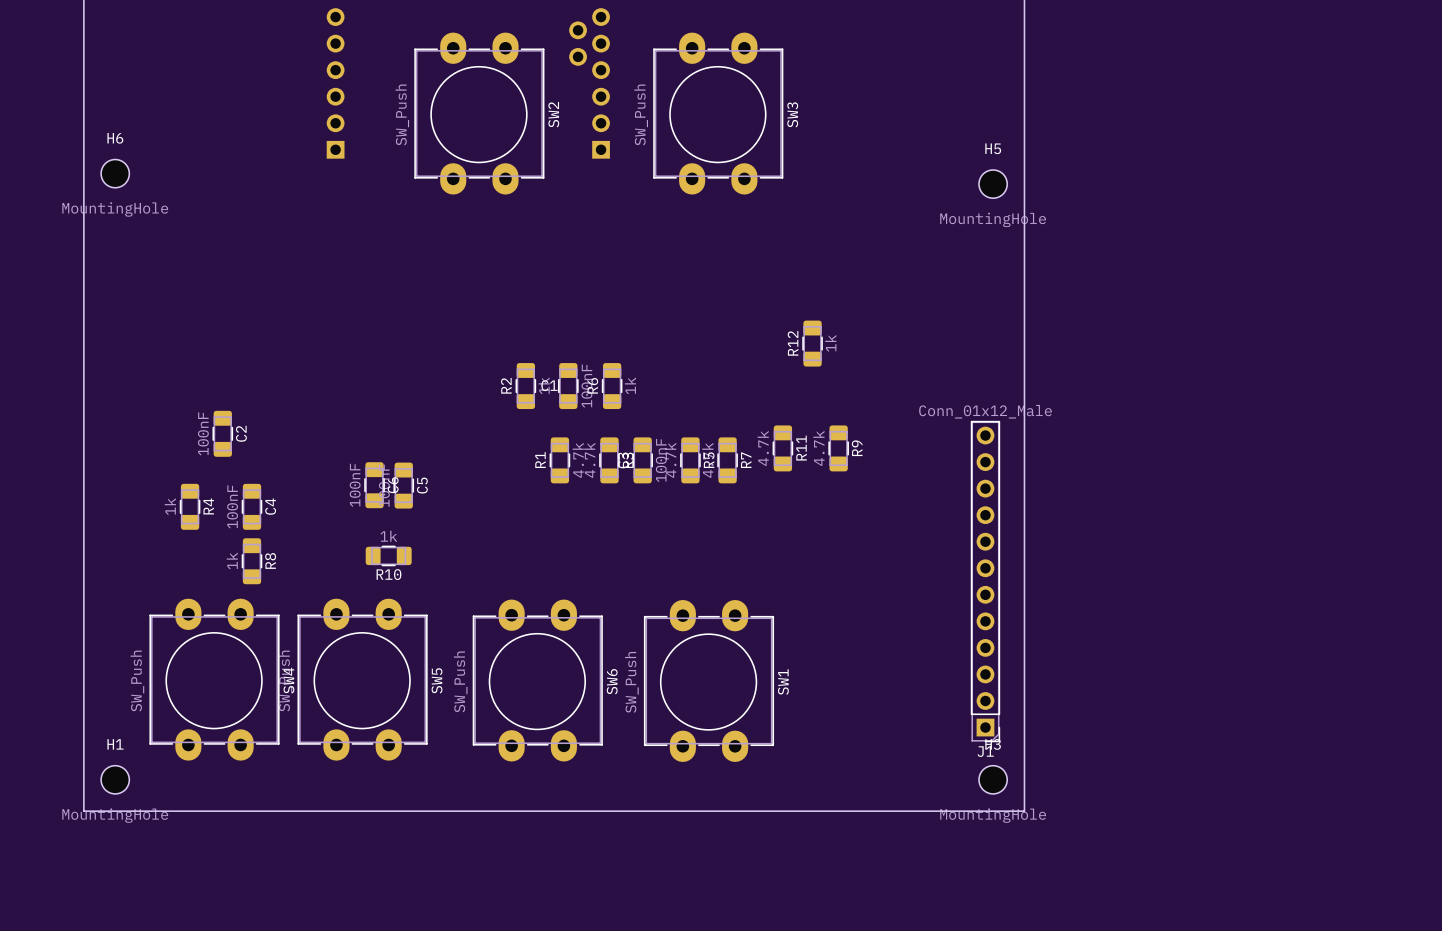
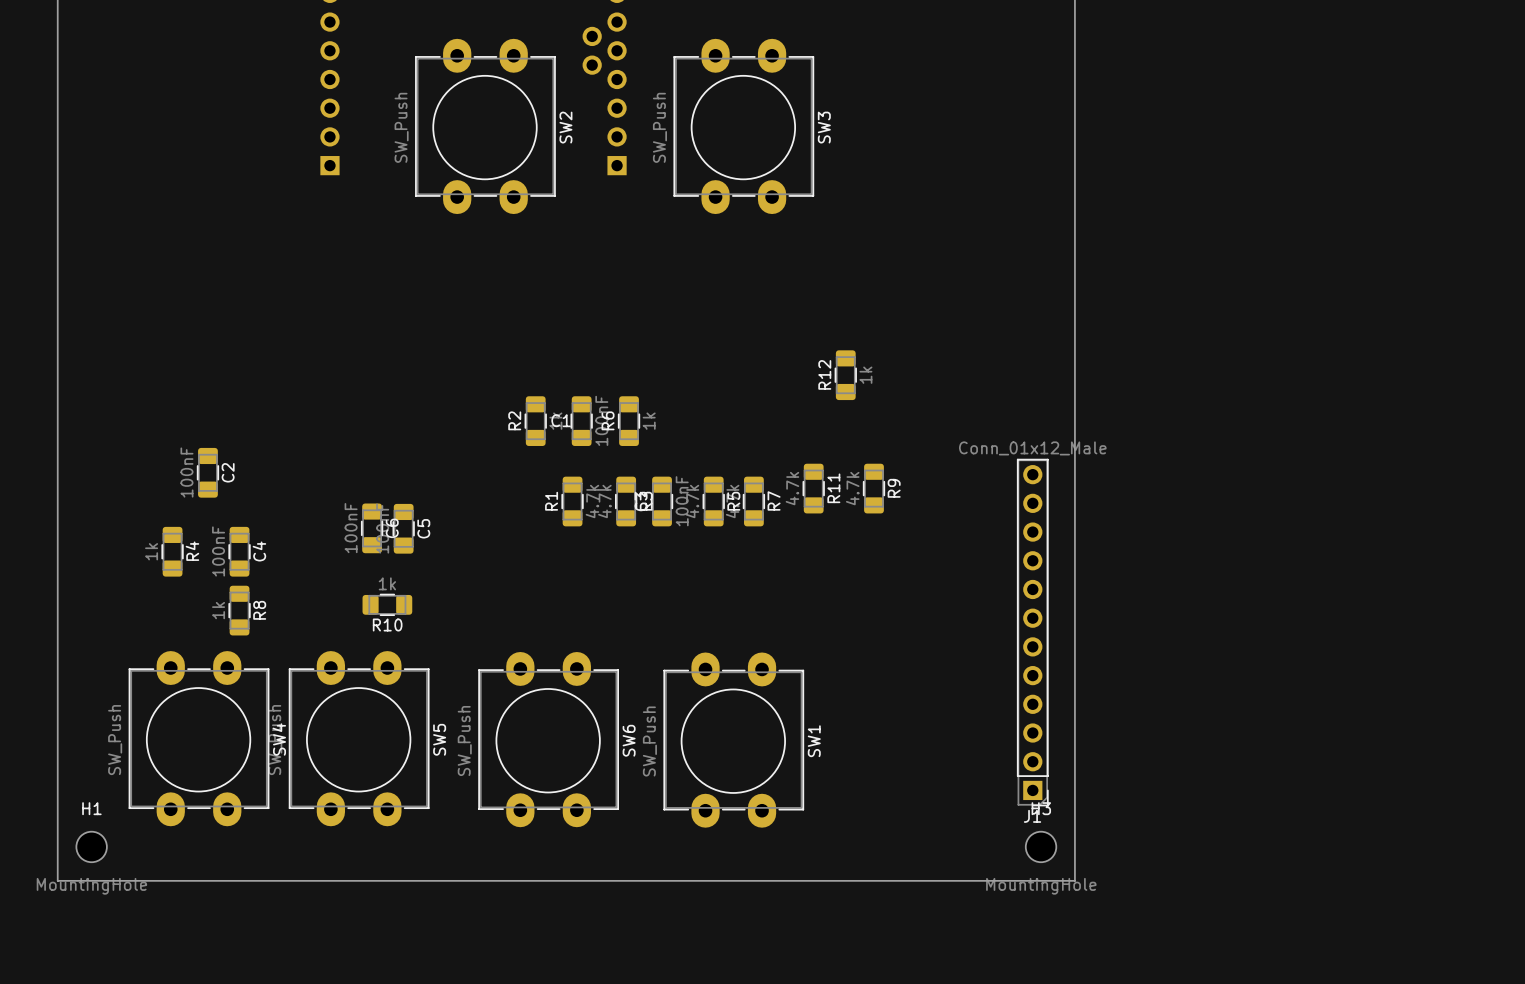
H6: MountingHole (115, 173) -> none
H5: MountingHole (993, 184) -> none

